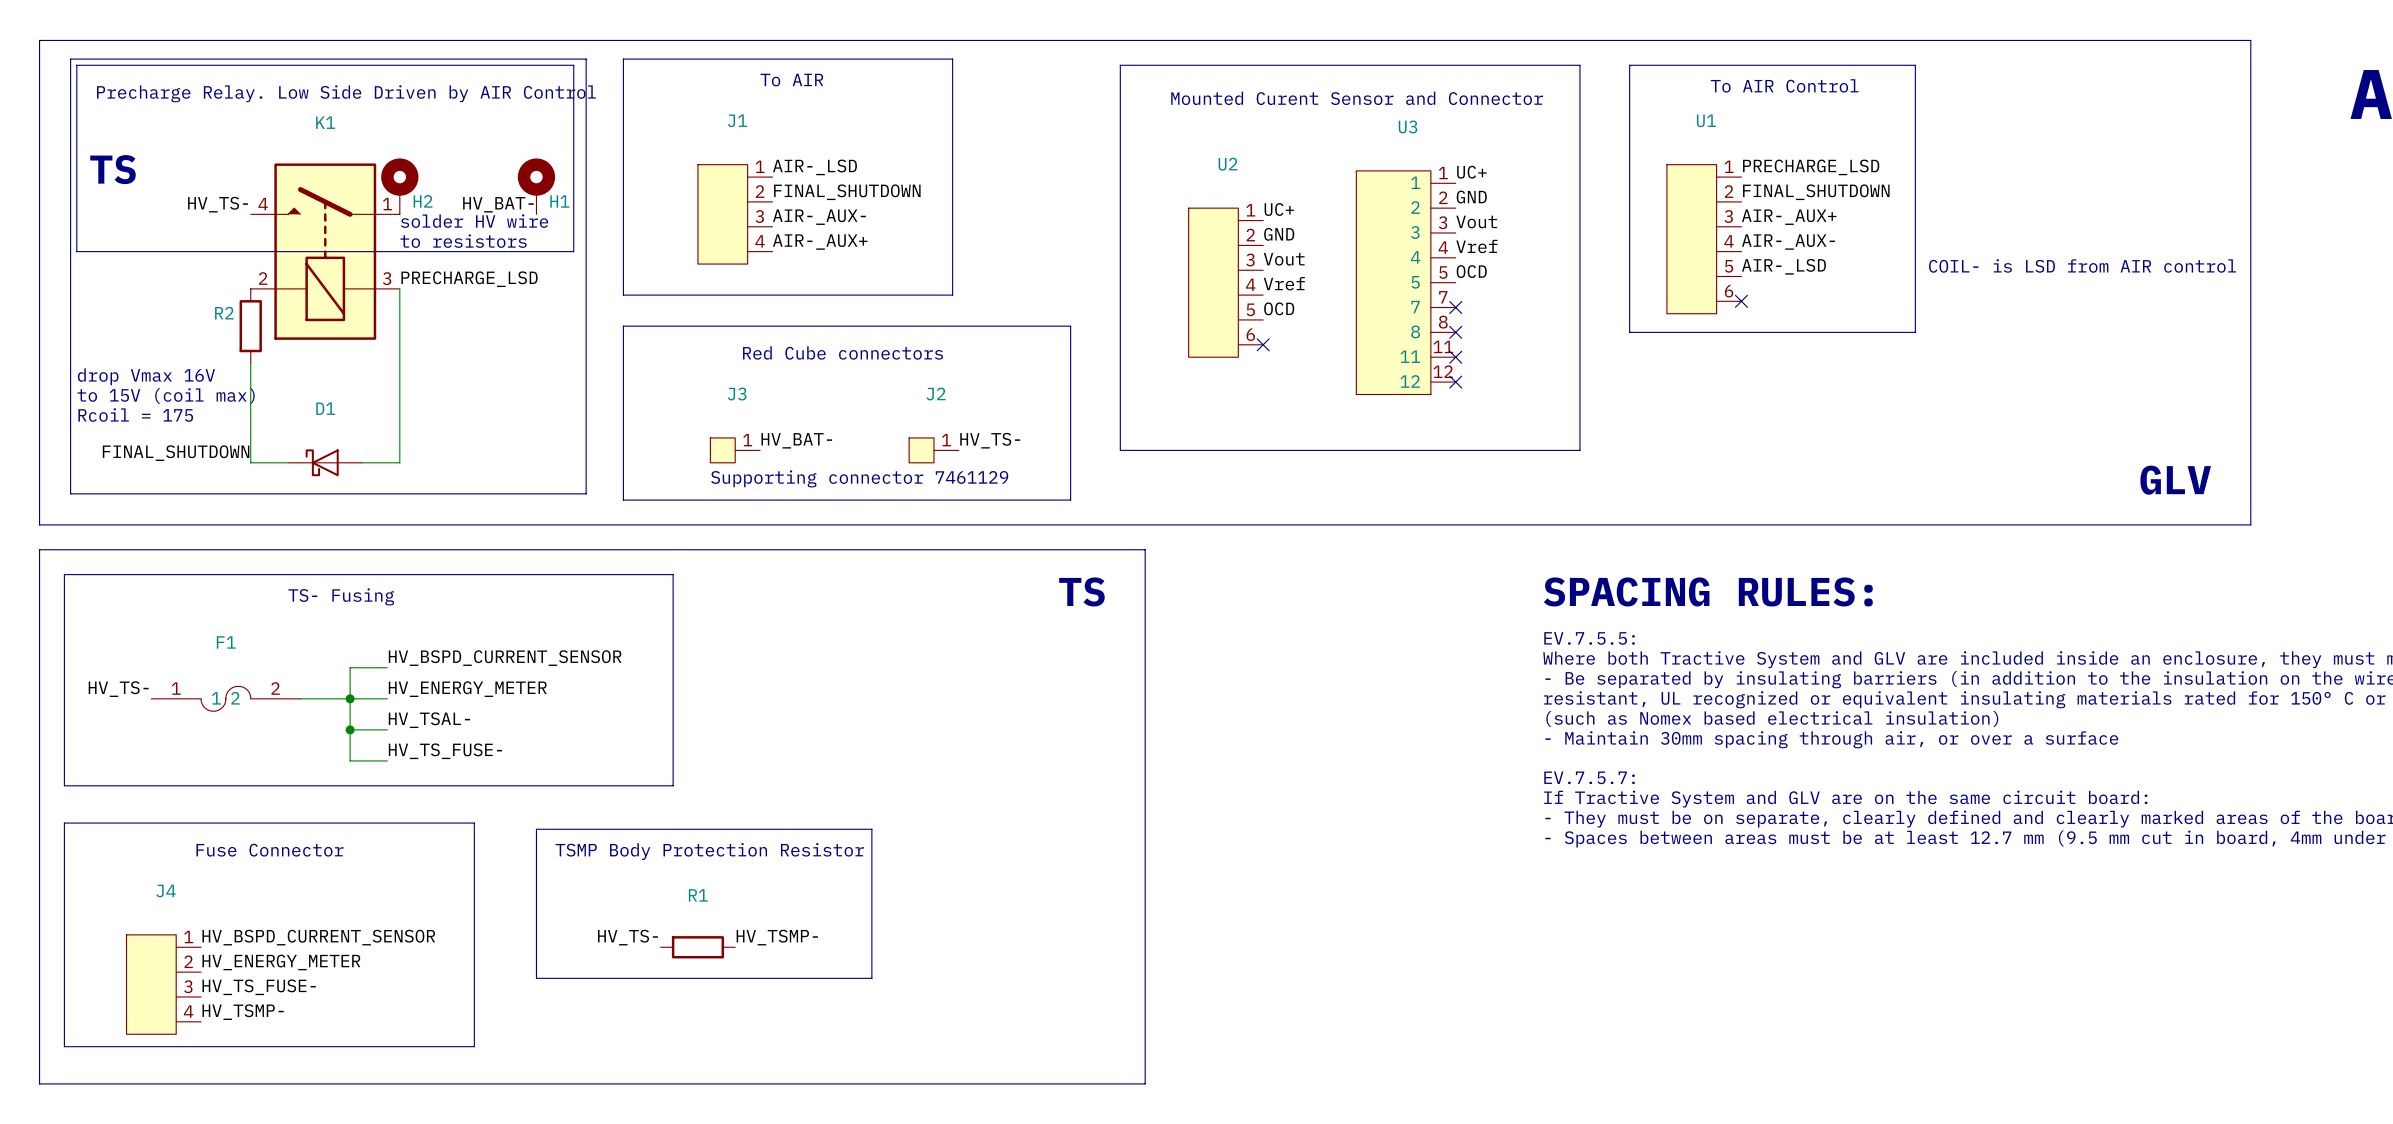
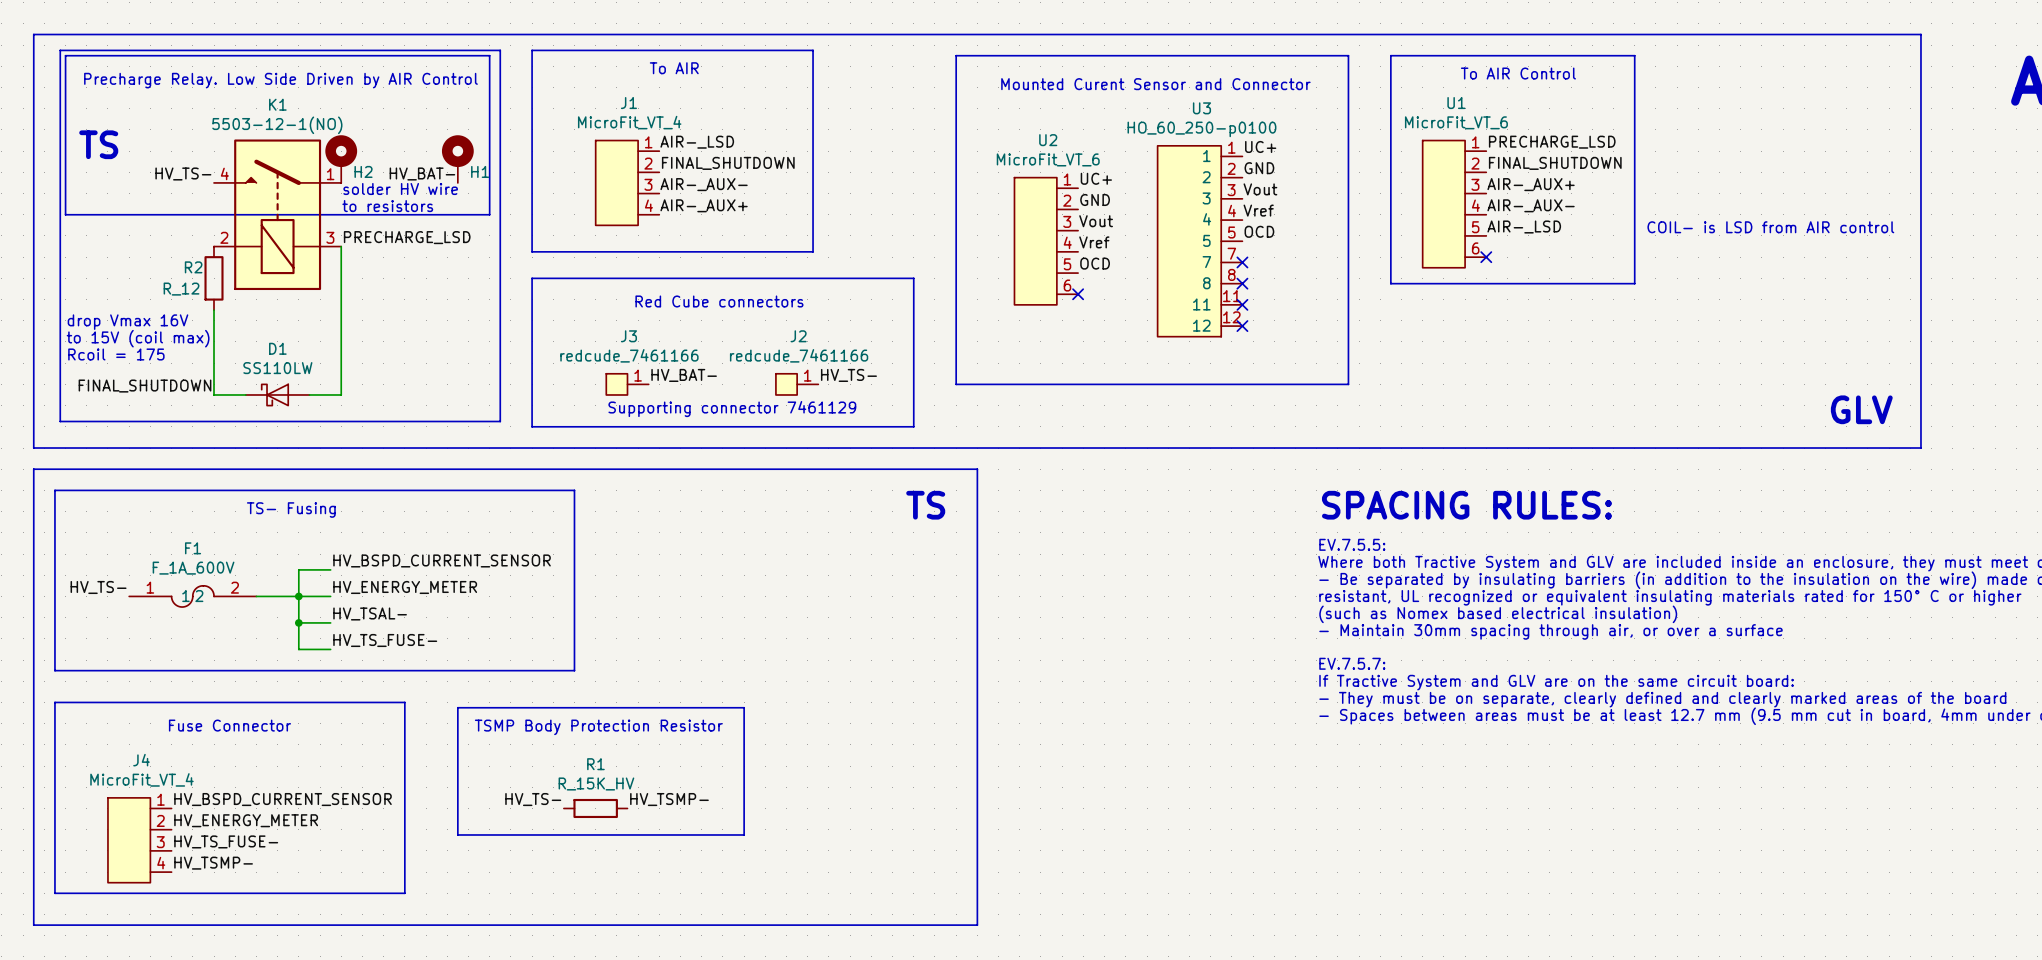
J1 value: none -> MicroFit_VT_4 (629, 122)
U1 value: none -> MicroFit_VT_6 (1456, 122)
K1 value: none -> 5503-12-1(NO) (277, 125)
U3 value: none -> HO_60_250-p0100 (1201, 129)
U2 value: none -> MicroFit_VT_6 (1048, 159)
R2 value: none -> R_12 (181, 289)
J3 value: none -> redcude_7461166 (629, 355)
J2 value: none -> redcude_7461166 (799, 355)
D1 value: none -> SS110LW (277, 368)
F1 value: none -> F_1A_600V (193, 568)
J4 value: none -> MicroFit_VT_4 (141, 779)
R1 value: none -> R_15K_HV (596, 783)

